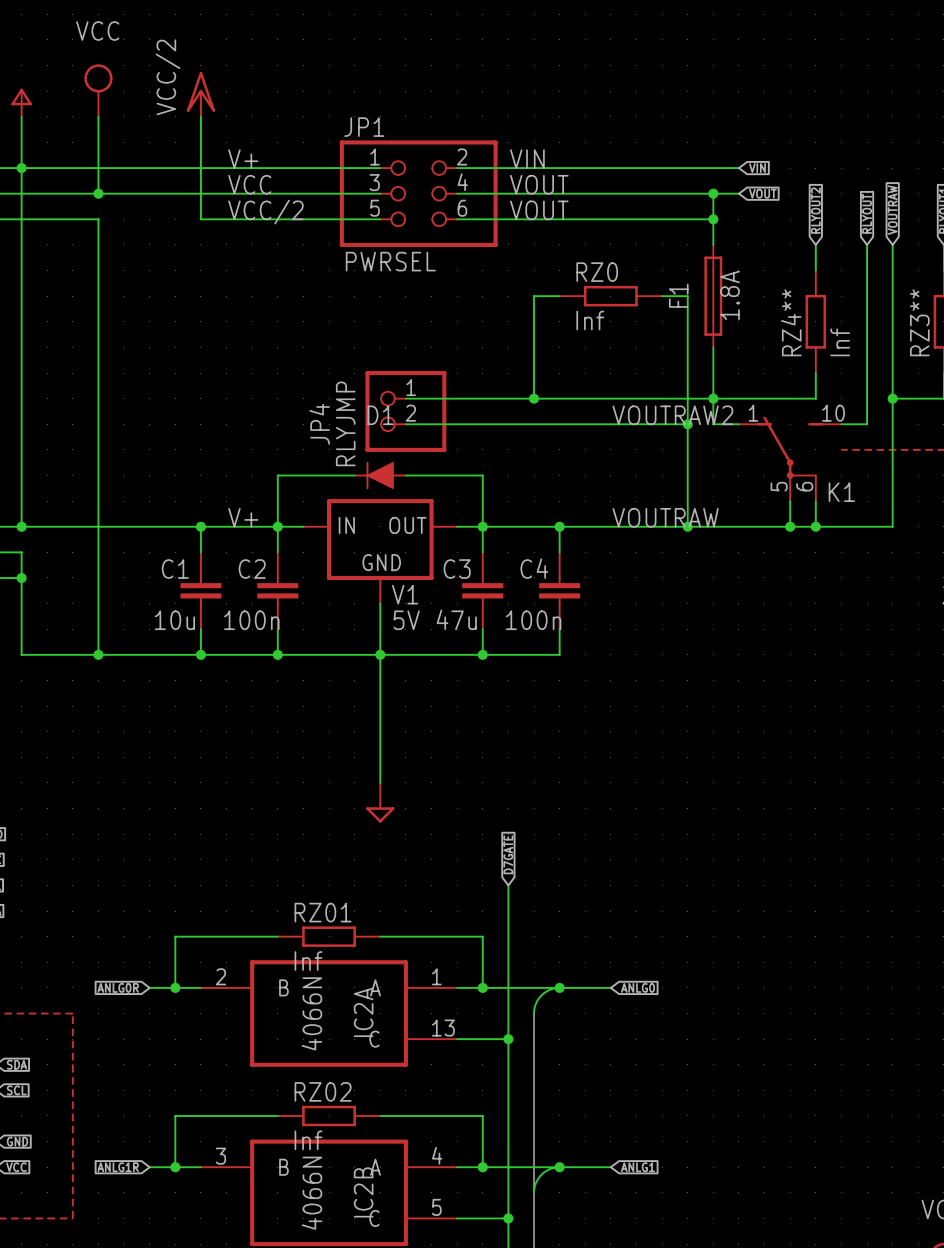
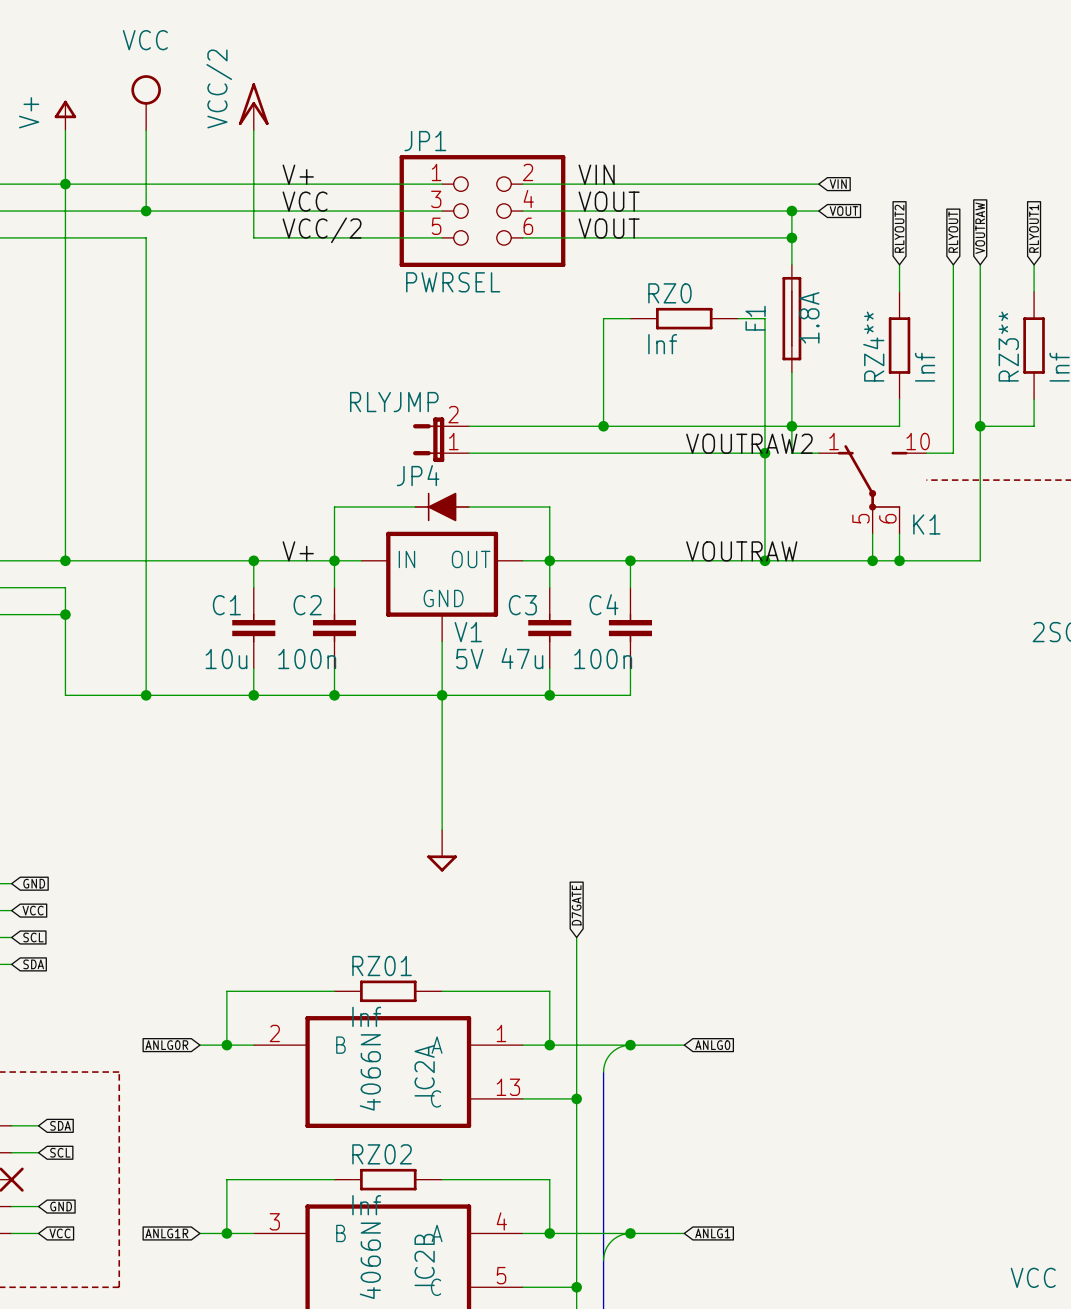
JP4 symbol: [365, 370, 447, 452] -> [413, 417, 470, 463]
D1 name: D1 (380, 415) -> none
JP4 value position: RLYJMP (345, 423) -> RLYJMP (394, 402)
JP4 name position: JP4 (319, 424) -> JP4 (418, 475)

